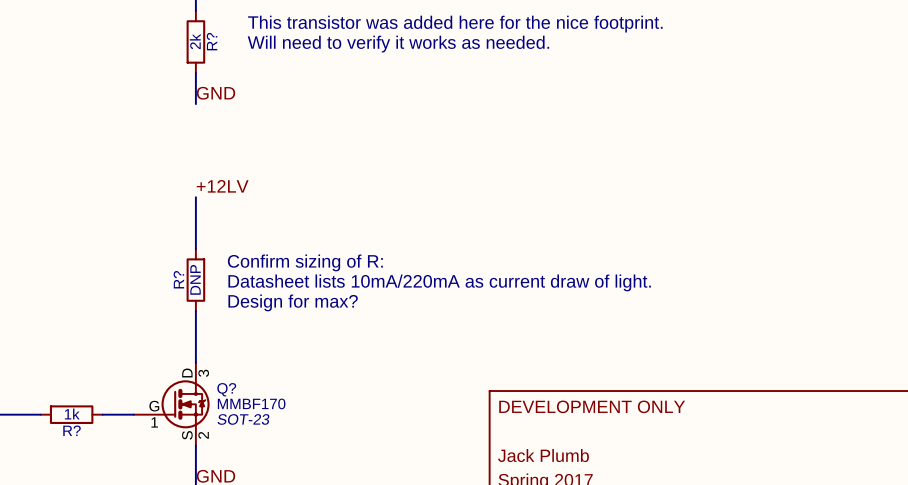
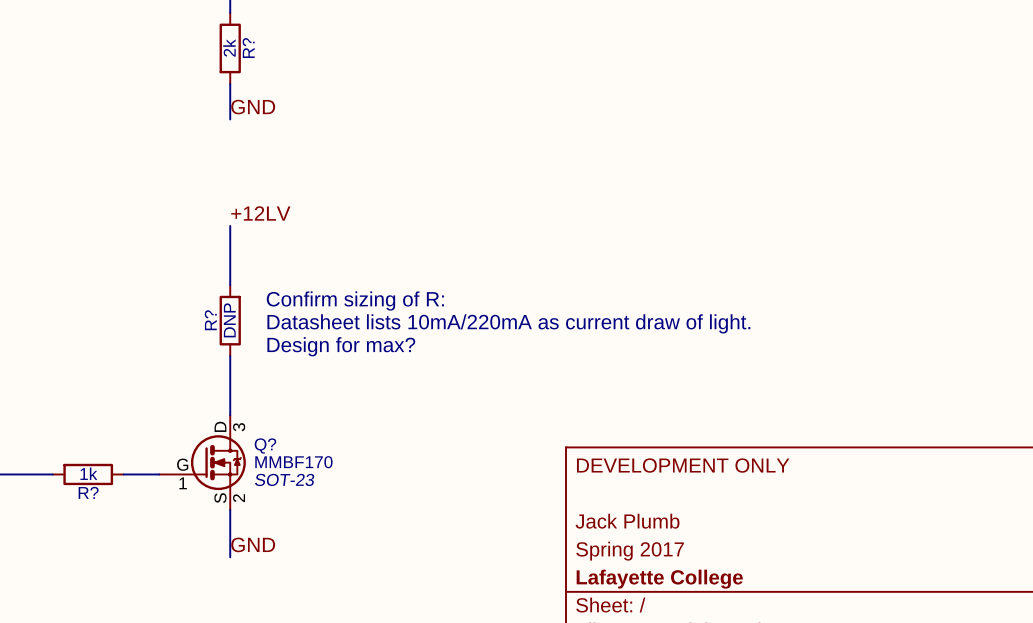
text: This transistor was added here for the nice footprint. (455, 24) -> none
text: Will need to verify it works as needed. (398, 44) -> none

